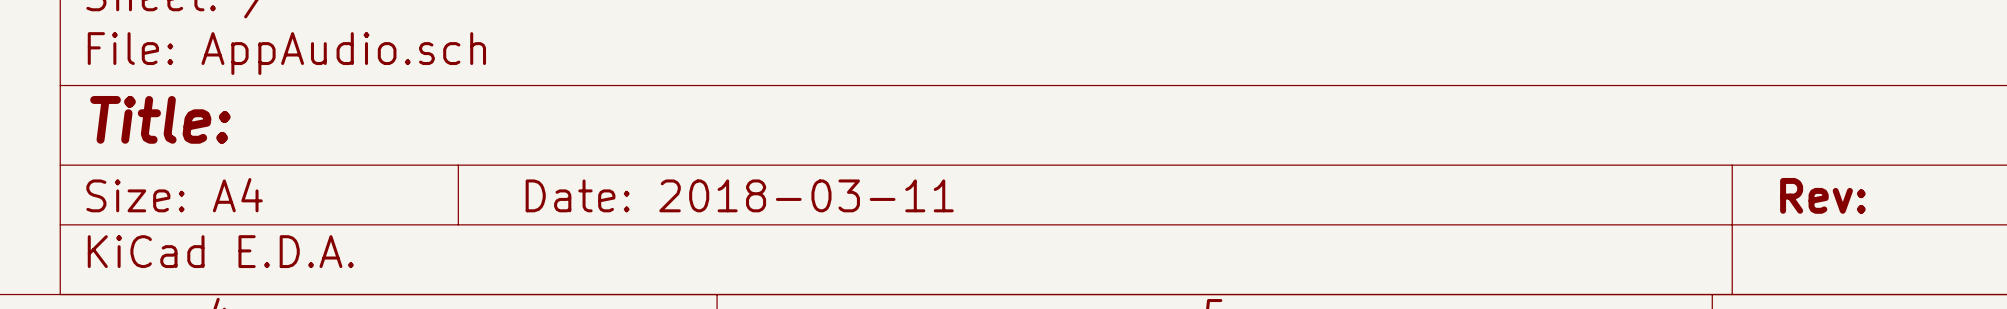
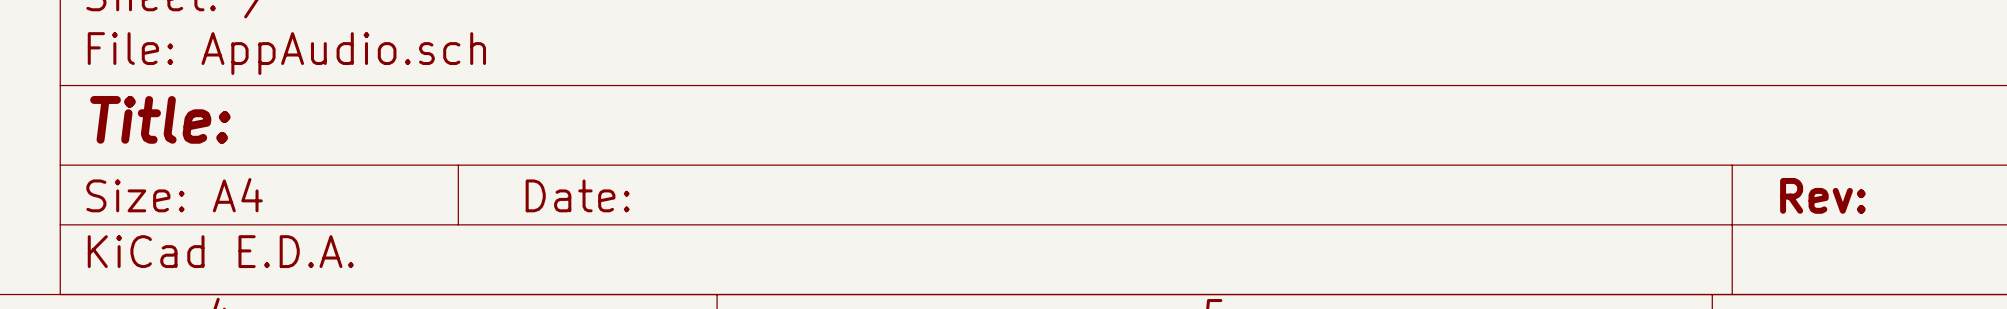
title block: Date: 2018-03-11 (739, 195) -> Date: (577, 195)

